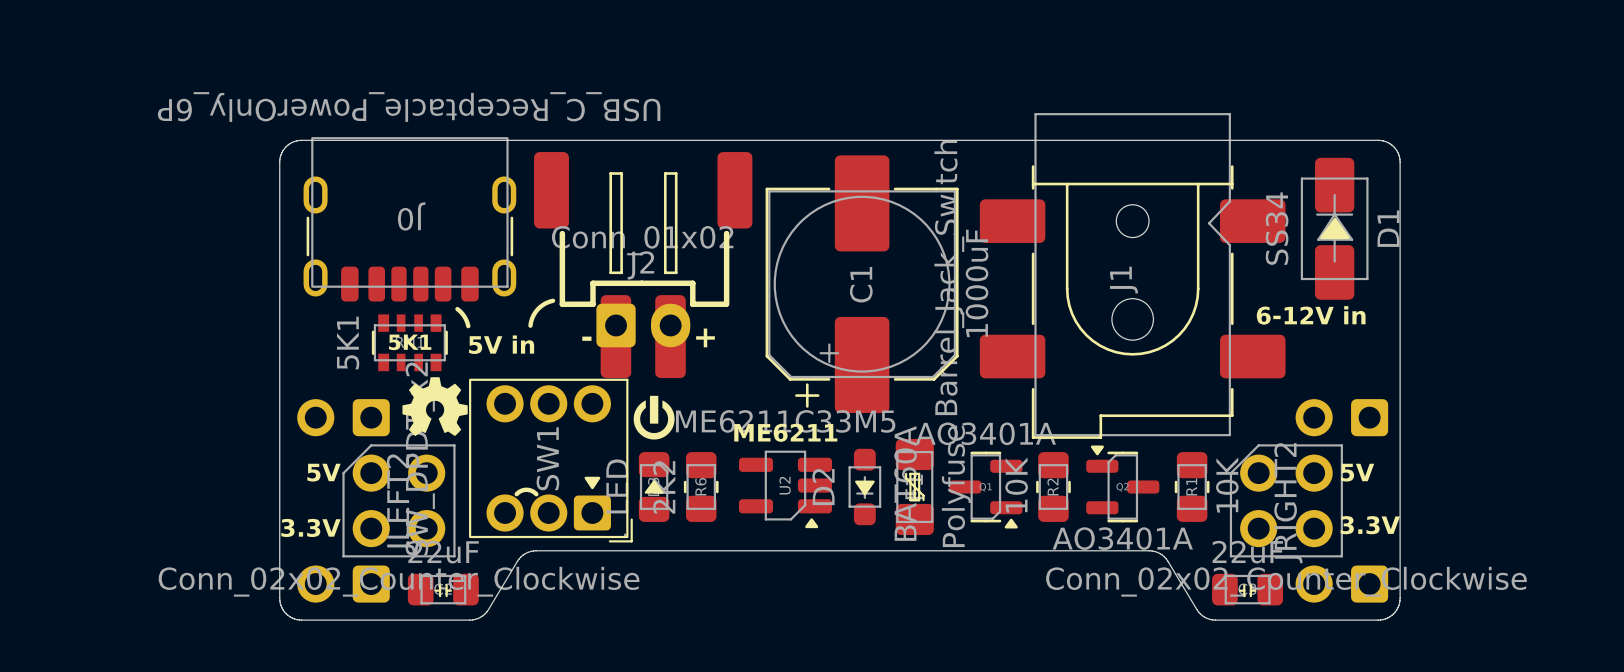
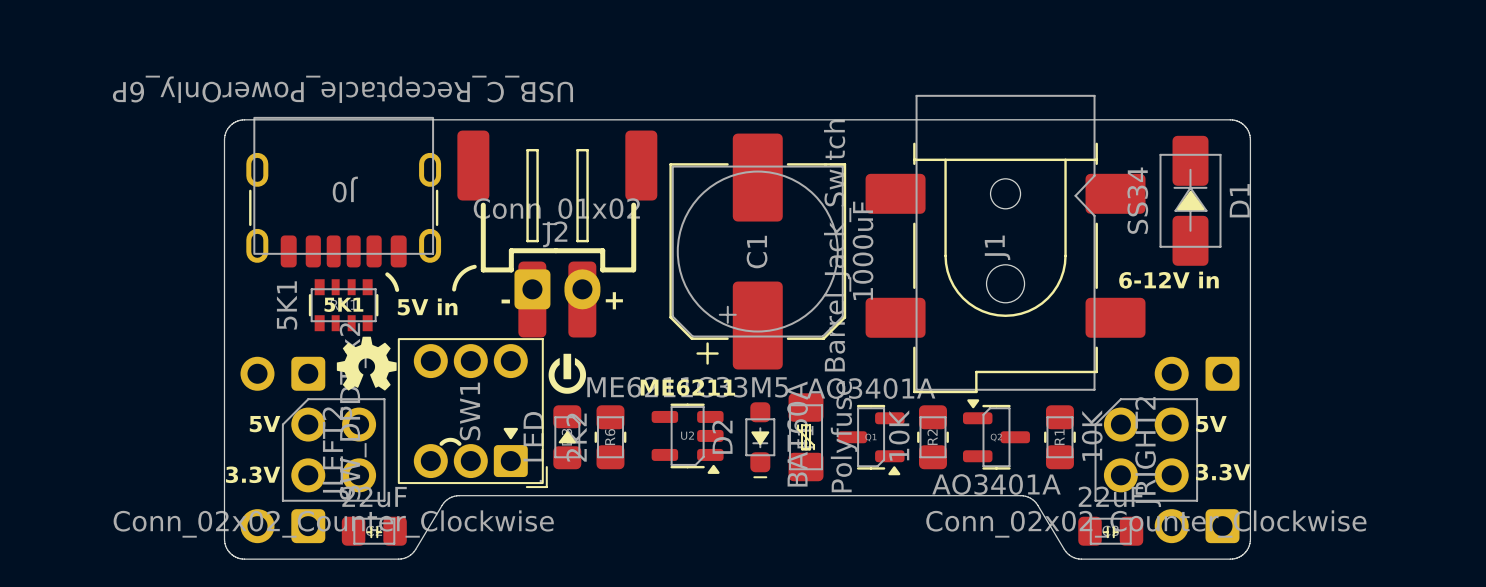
D2 footprint: [848, 448, 882, 526] -> [745, 402, 776, 479]
U2 footprint: [738, 450, 832, 529] -> [651, 403, 724, 474]

